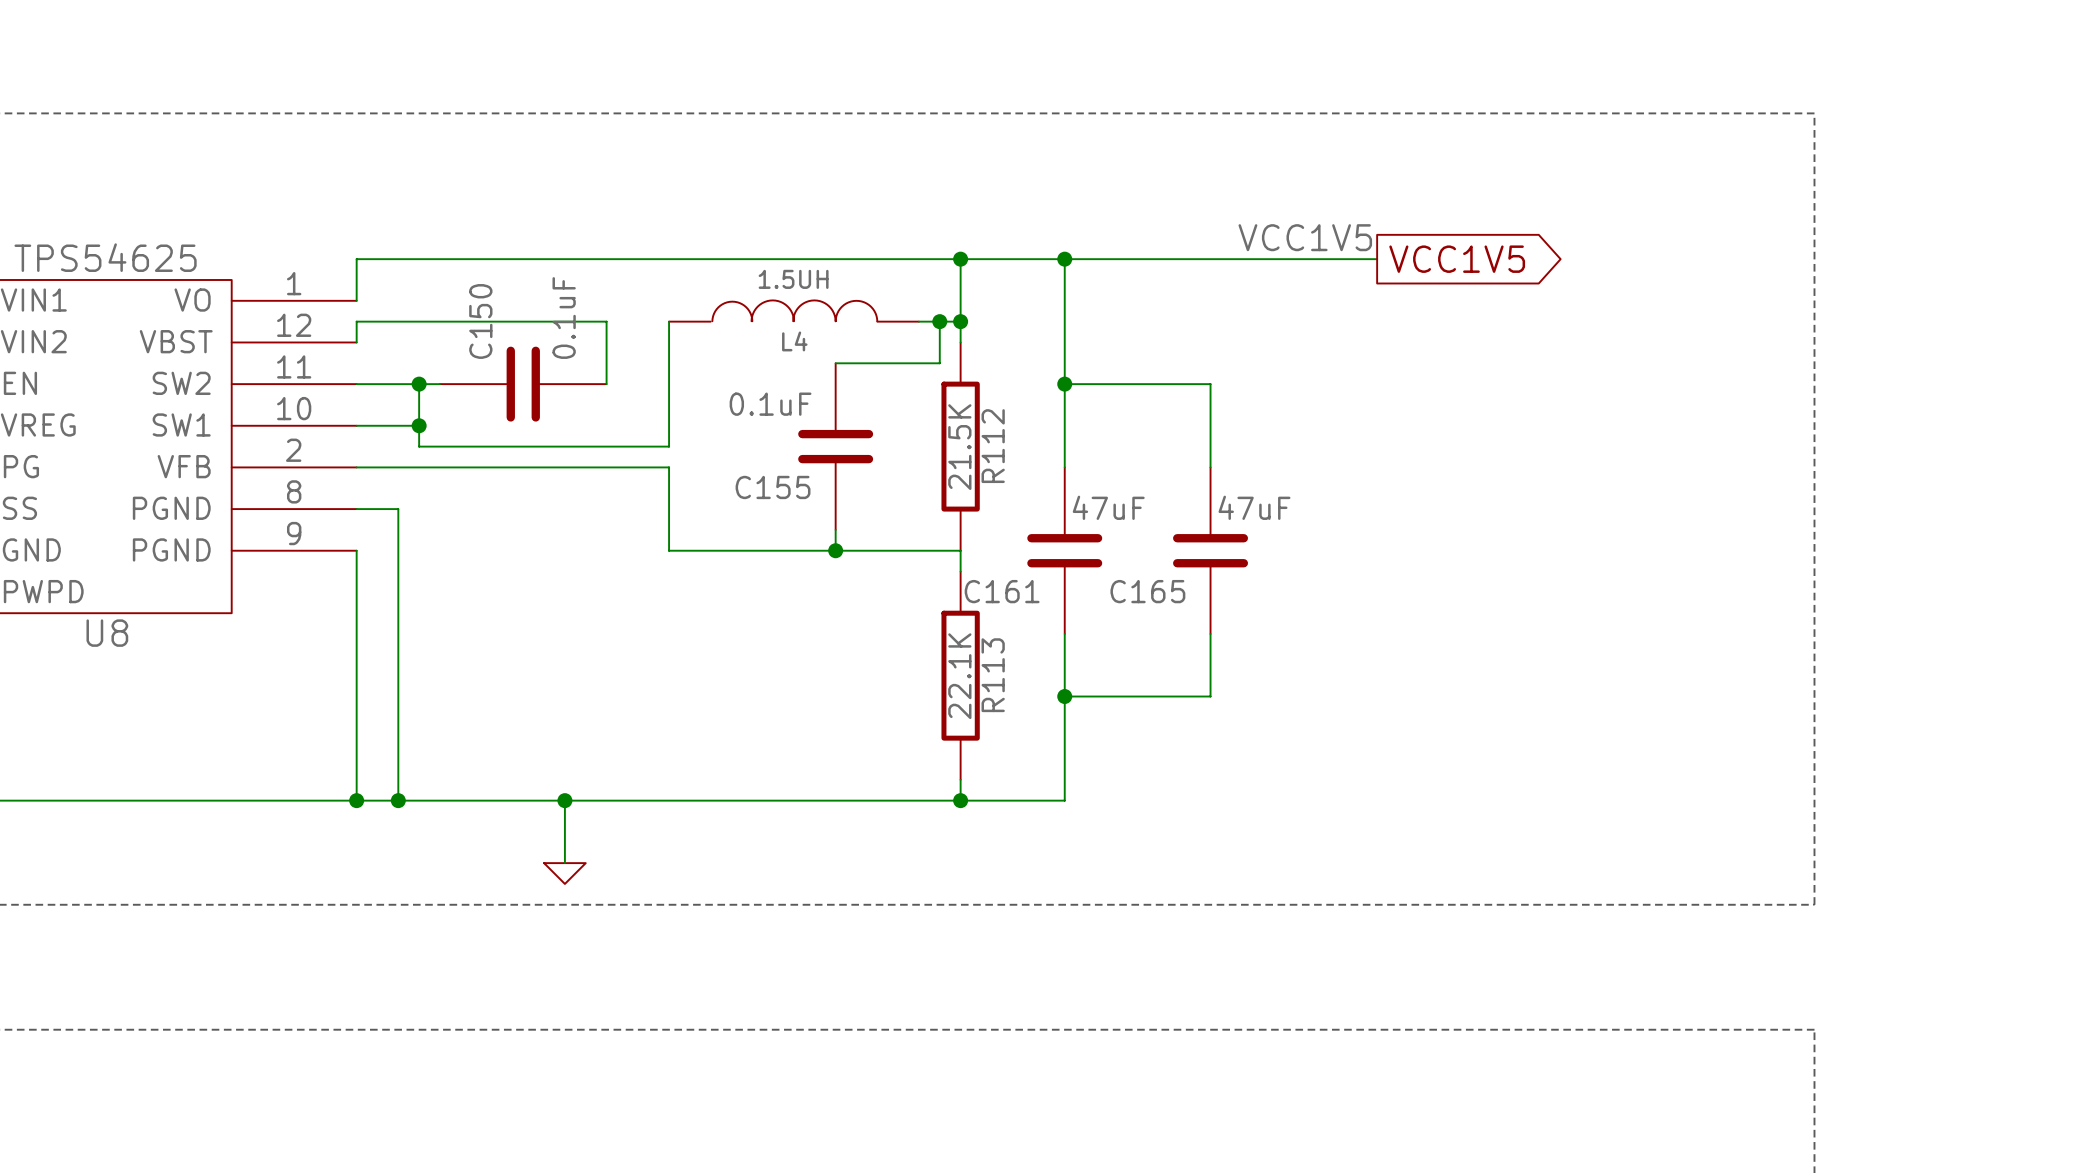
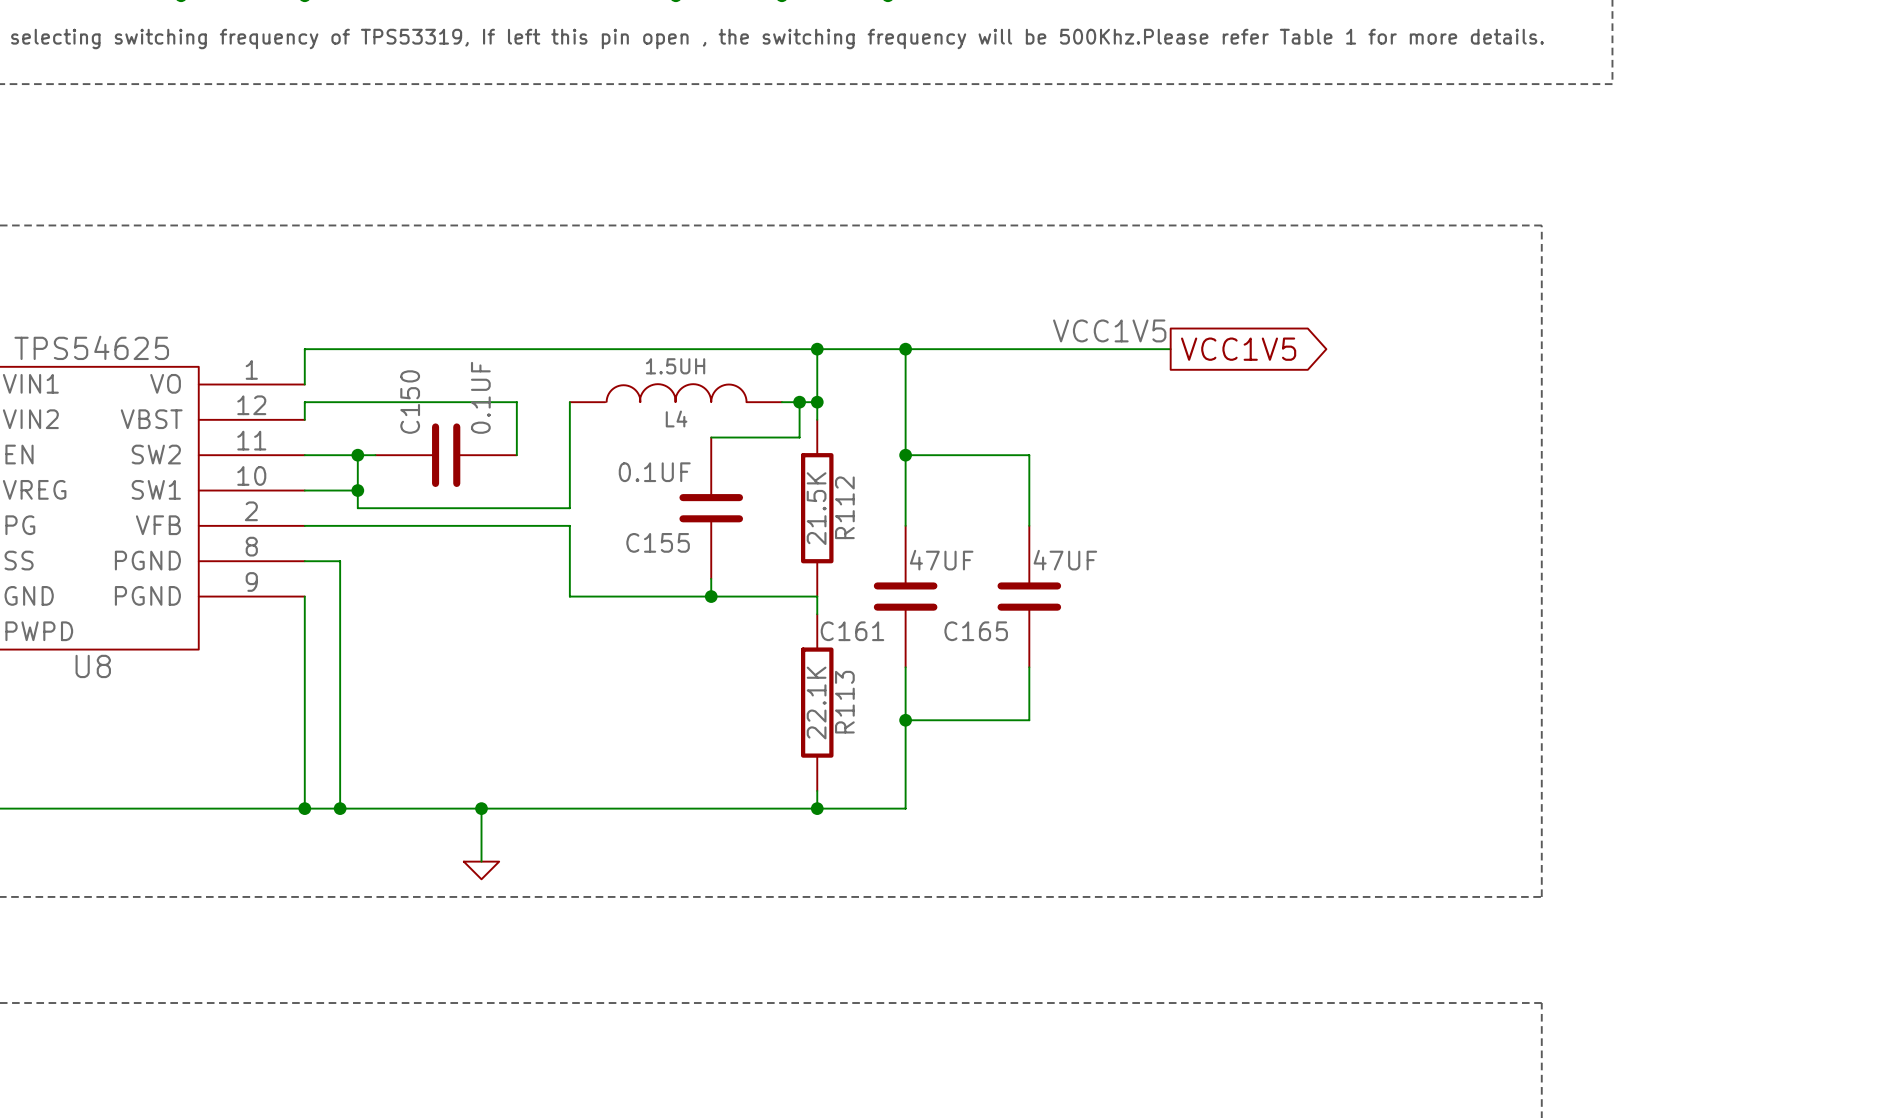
C150 value: 0.1uF (564, 318) -> 0.1UF (480, 397)
C155 value: 0.1uF (770, 404) -> 0.1UF (654, 472)
C161 value: 47uF (1108, 507) -> 47UF (941, 560)
C165 value: 47uF (1254, 507) -> 47UF (1065, 560)

